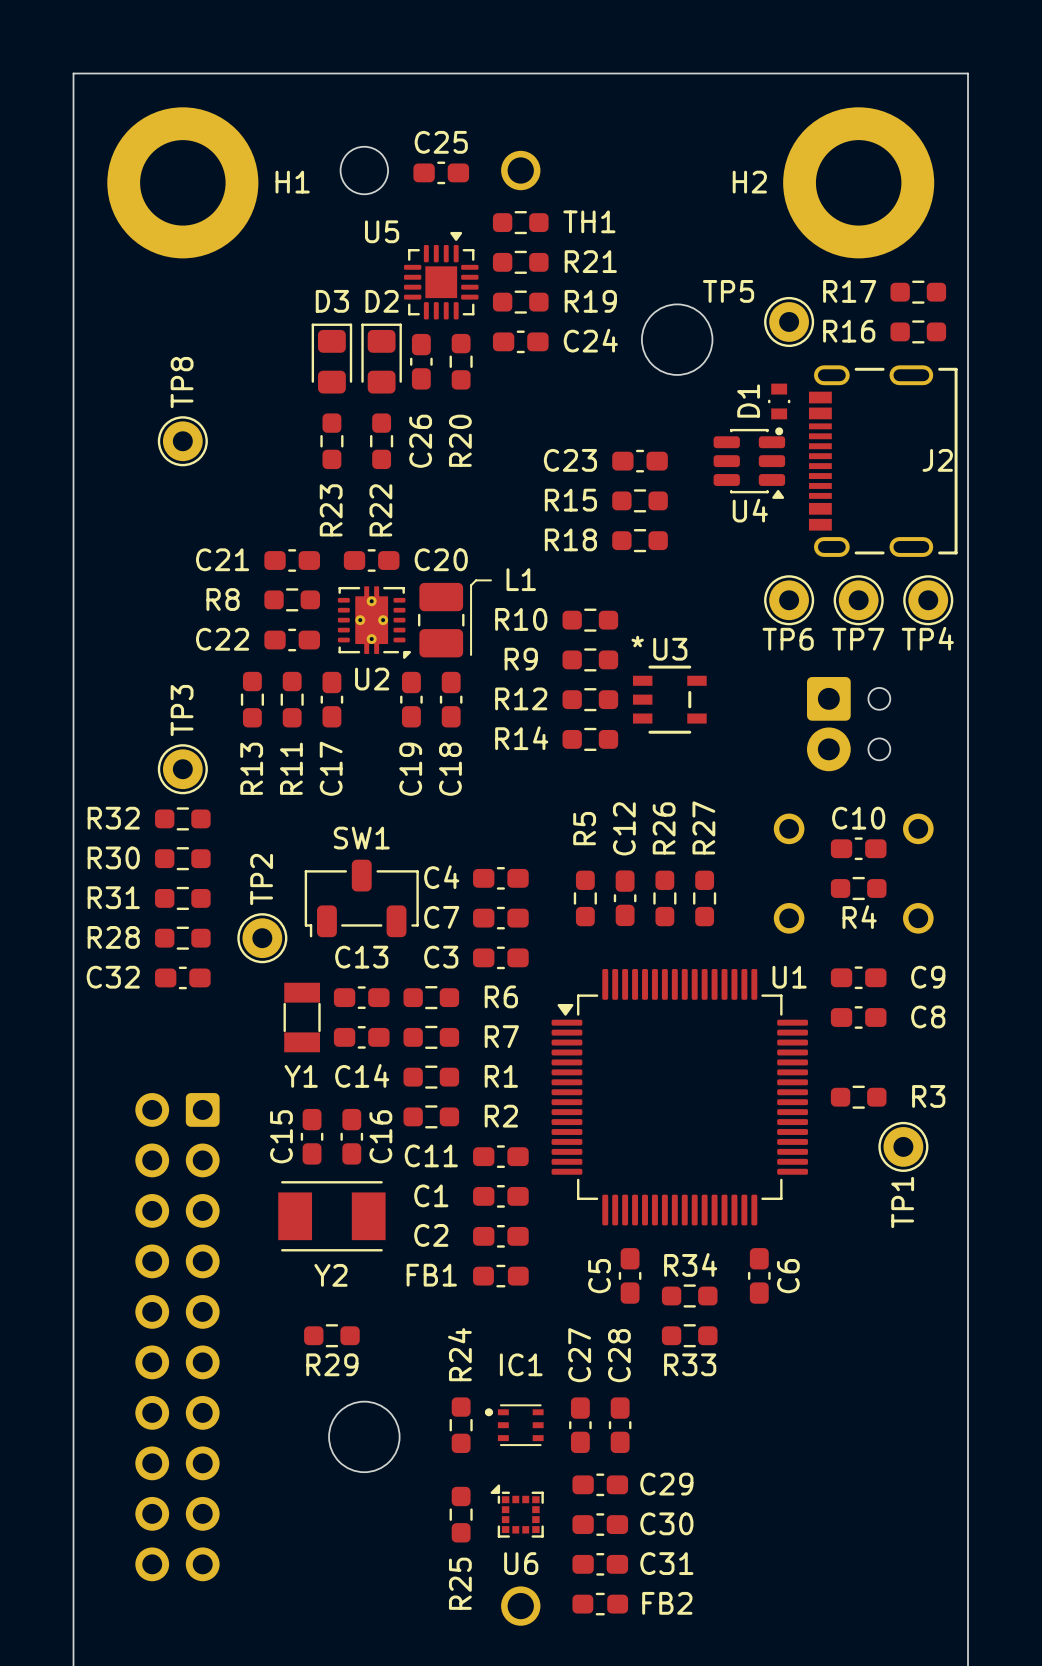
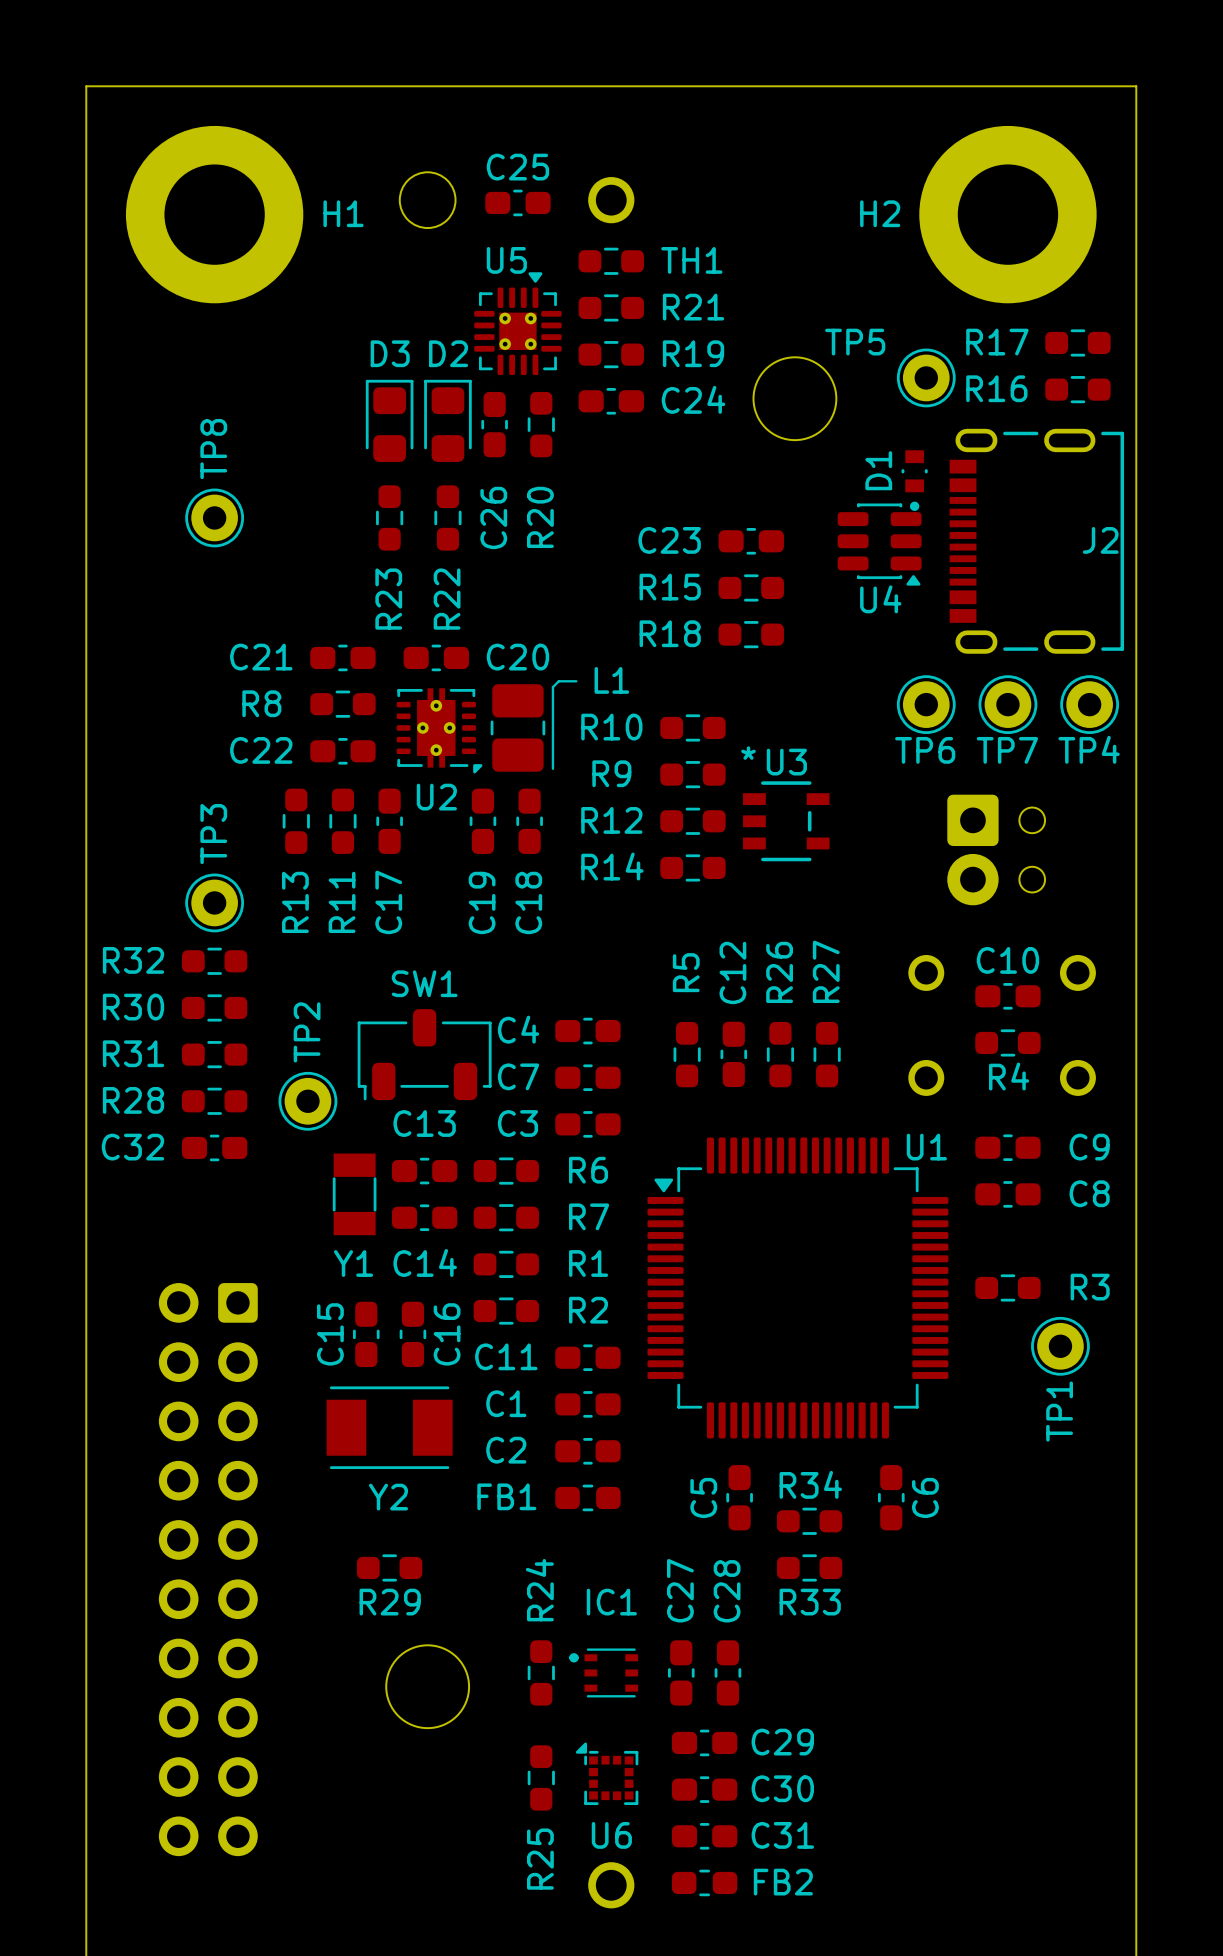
U5 name position: U5 (382, 231) -> U5 (506, 260)
U5 footprint: [403, 231, 479, 320] -> [474, 272, 562, 376]

